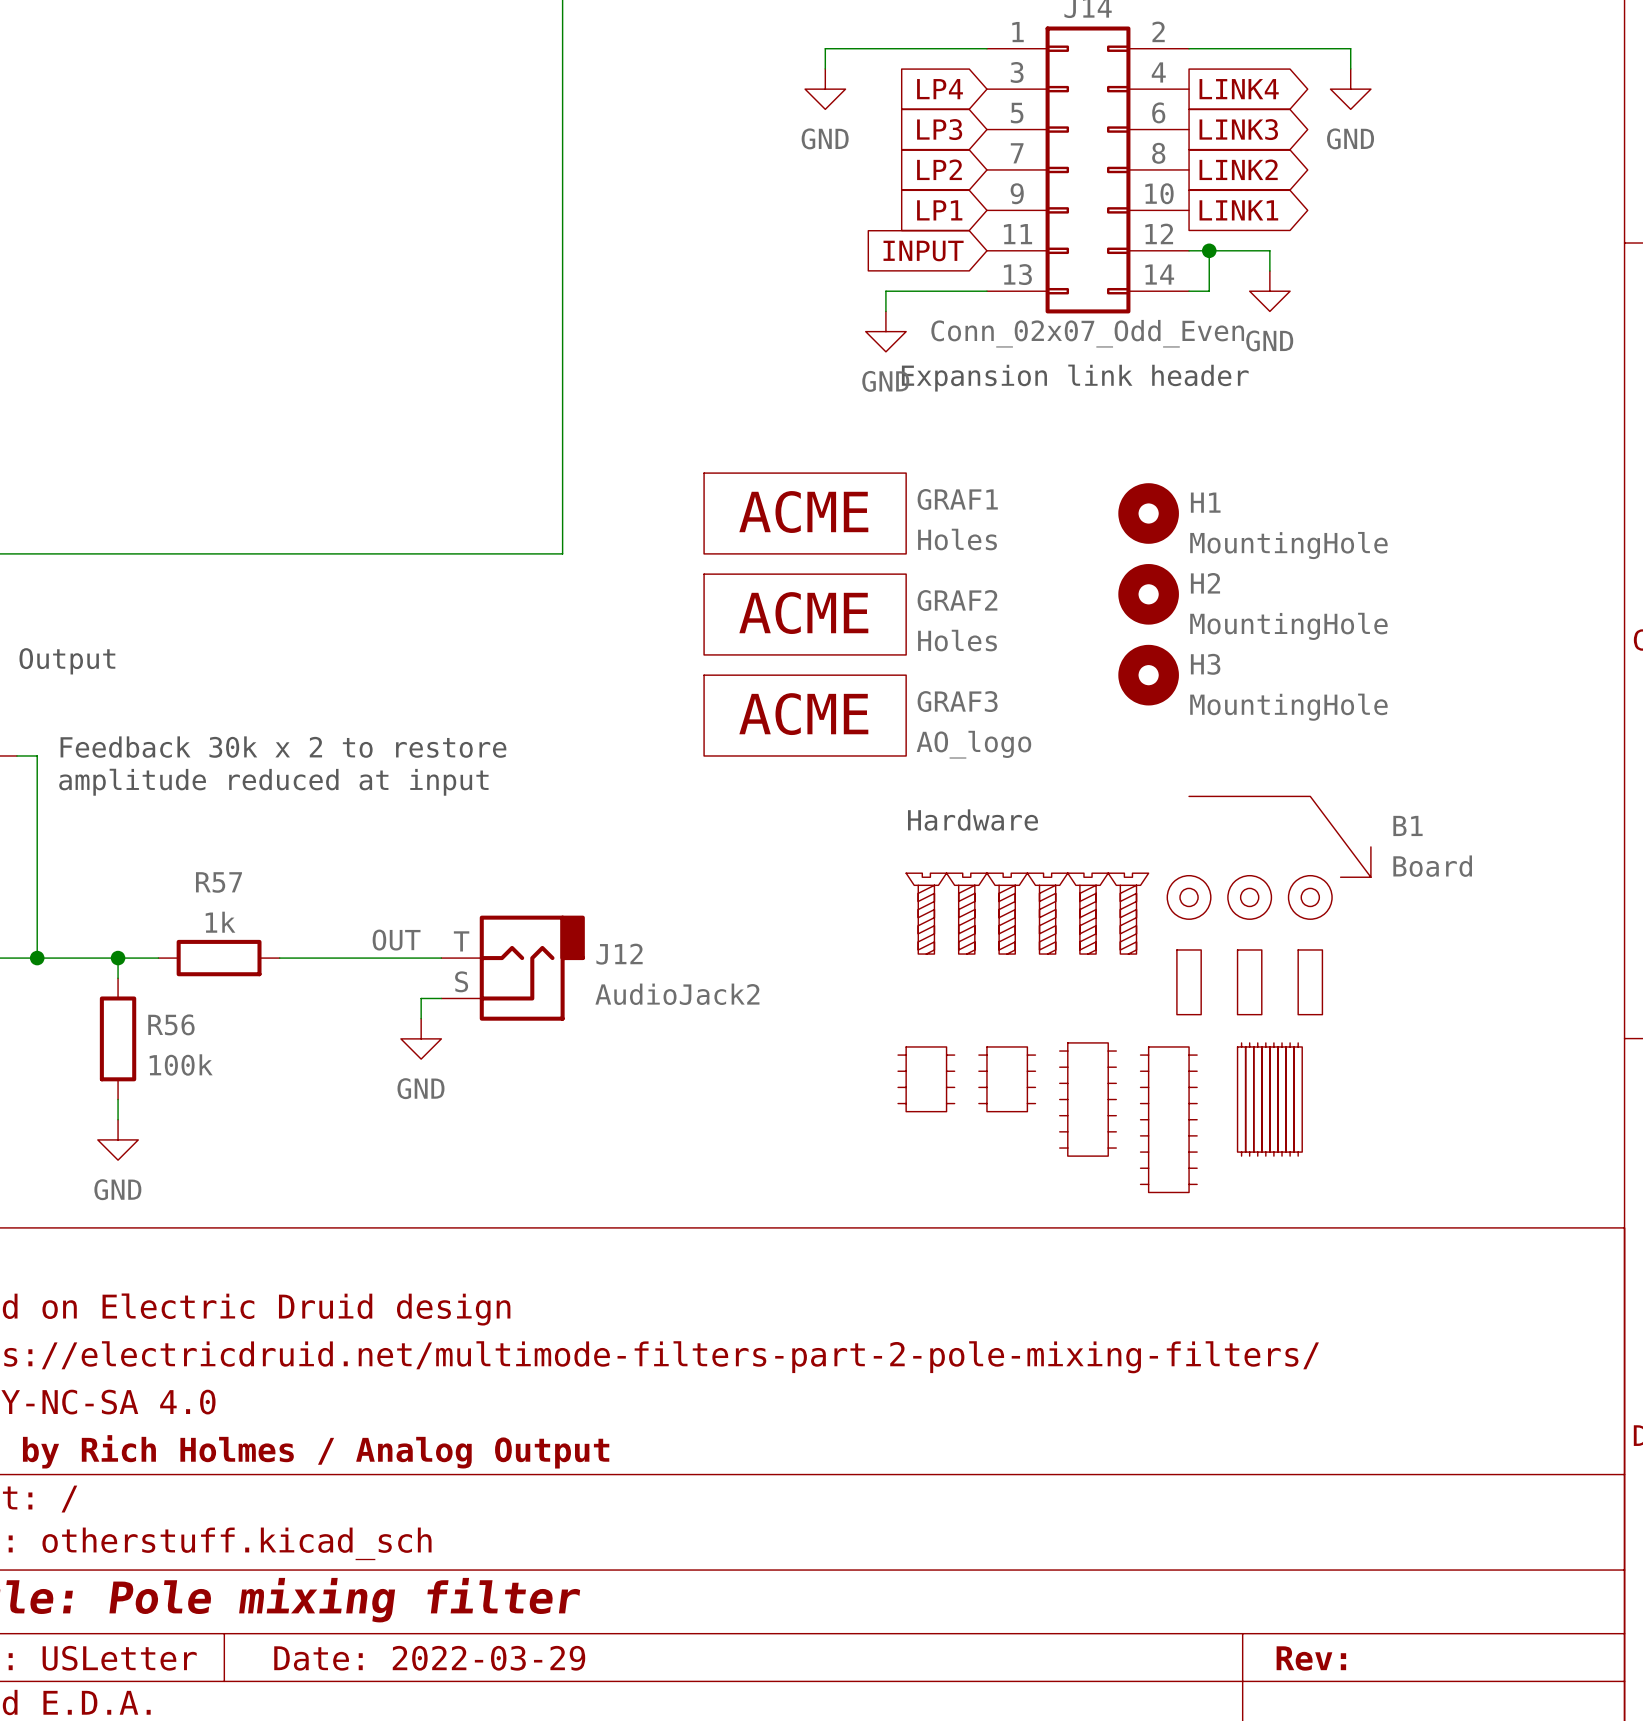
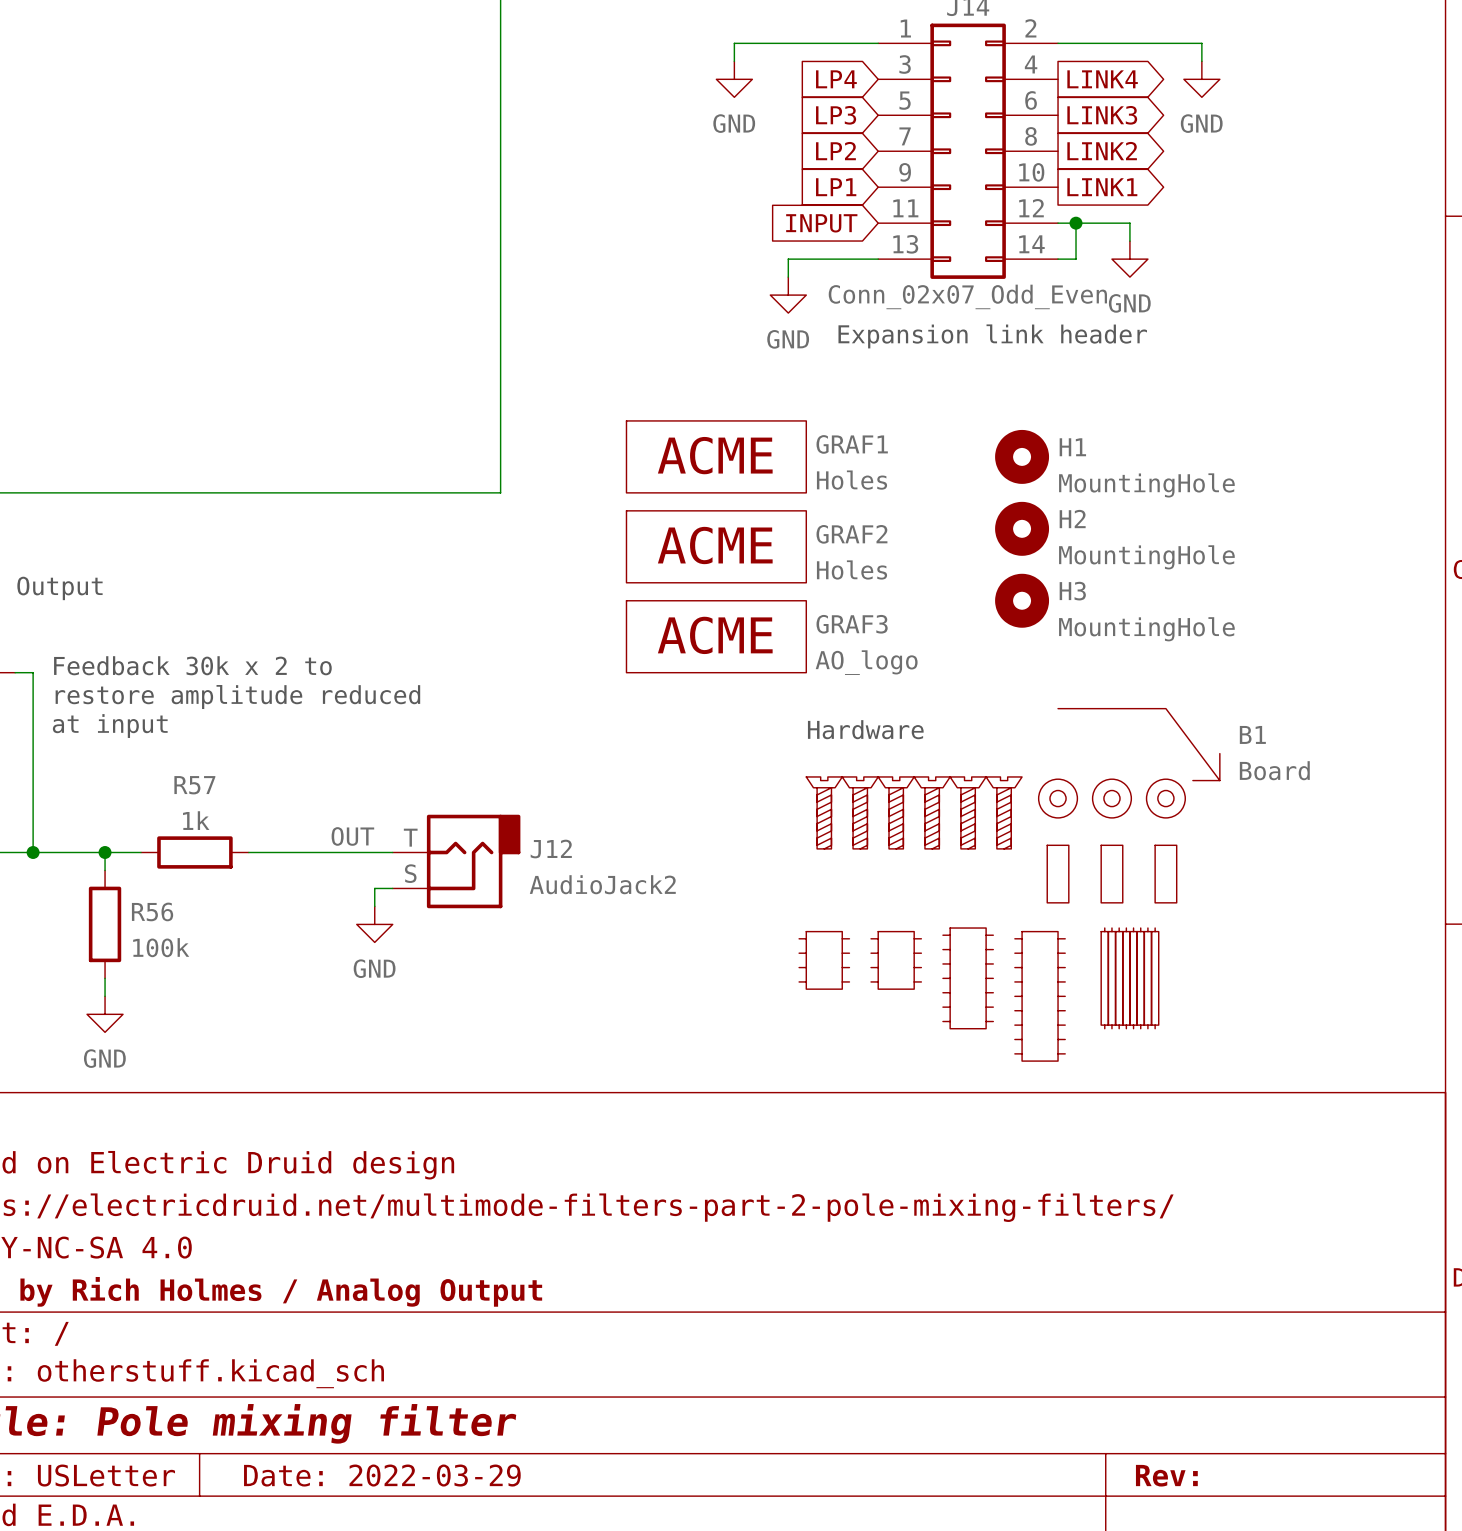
text position: Expansion link header (1075, 378) -> Expansion link header (992, 336)
text: Feedback 30k x 2 to restore (283, 747) -> restore amplitude reduced (237, 697)
text: none -> Feedback 30k x 2 to (192, 665)
text: amplitude reduced at input (273, 782) -> at input (110, 726)

